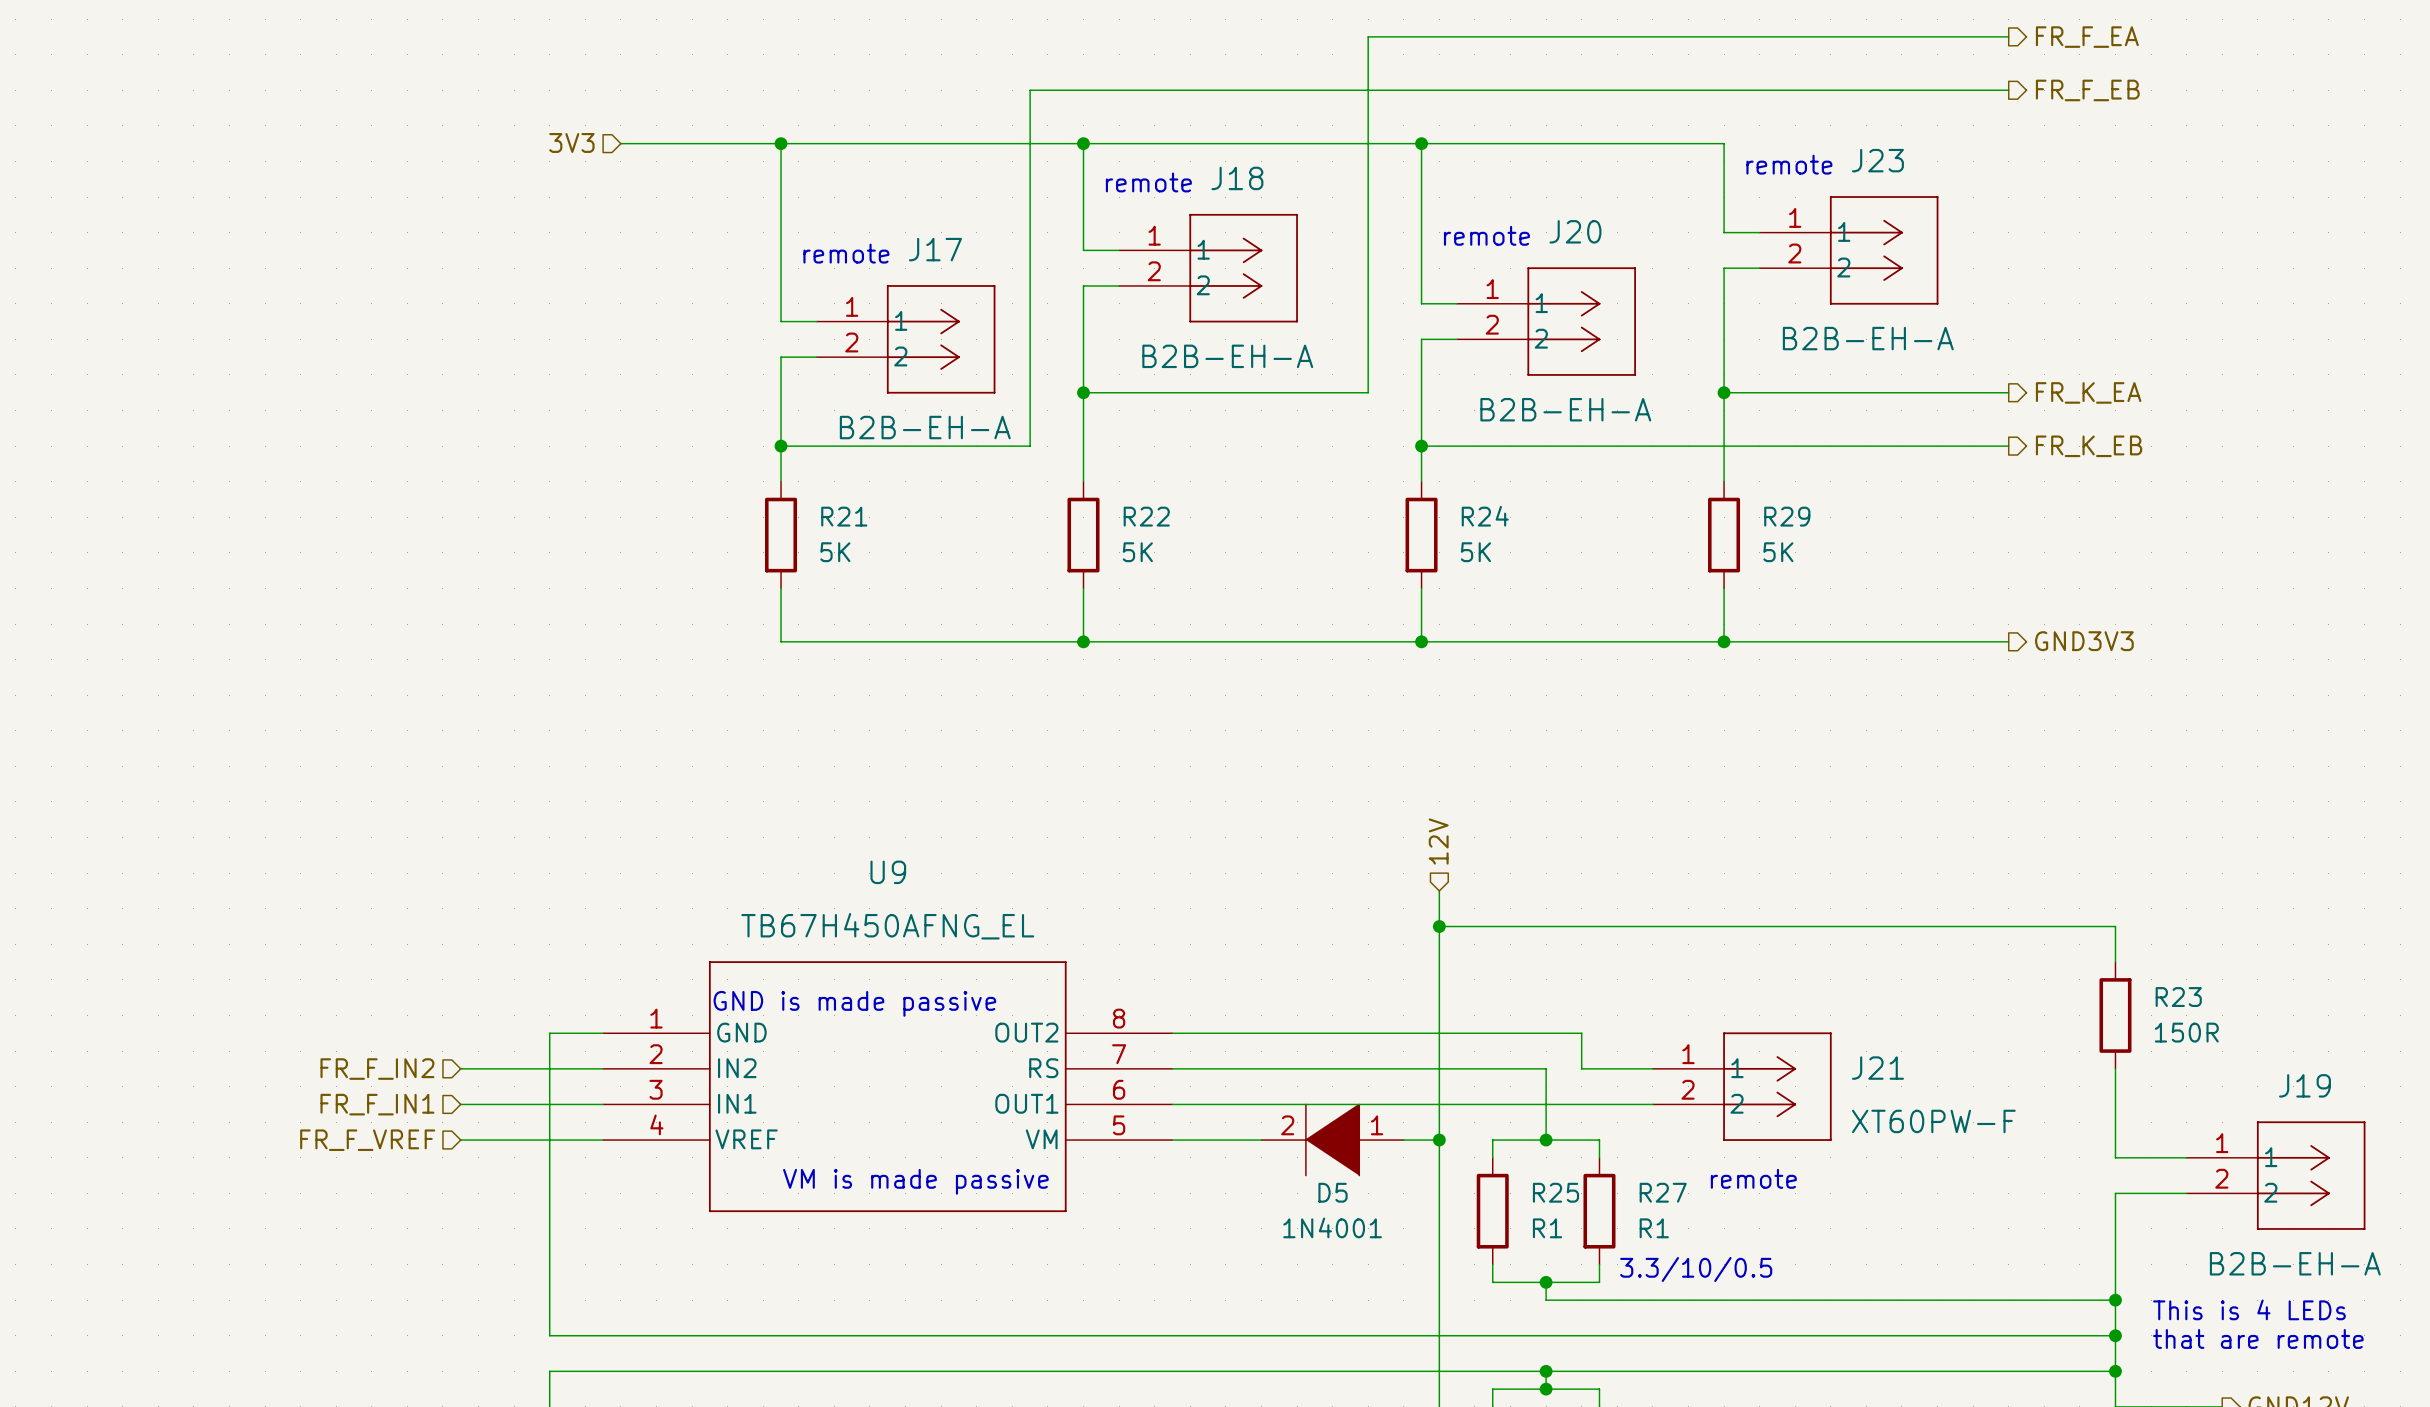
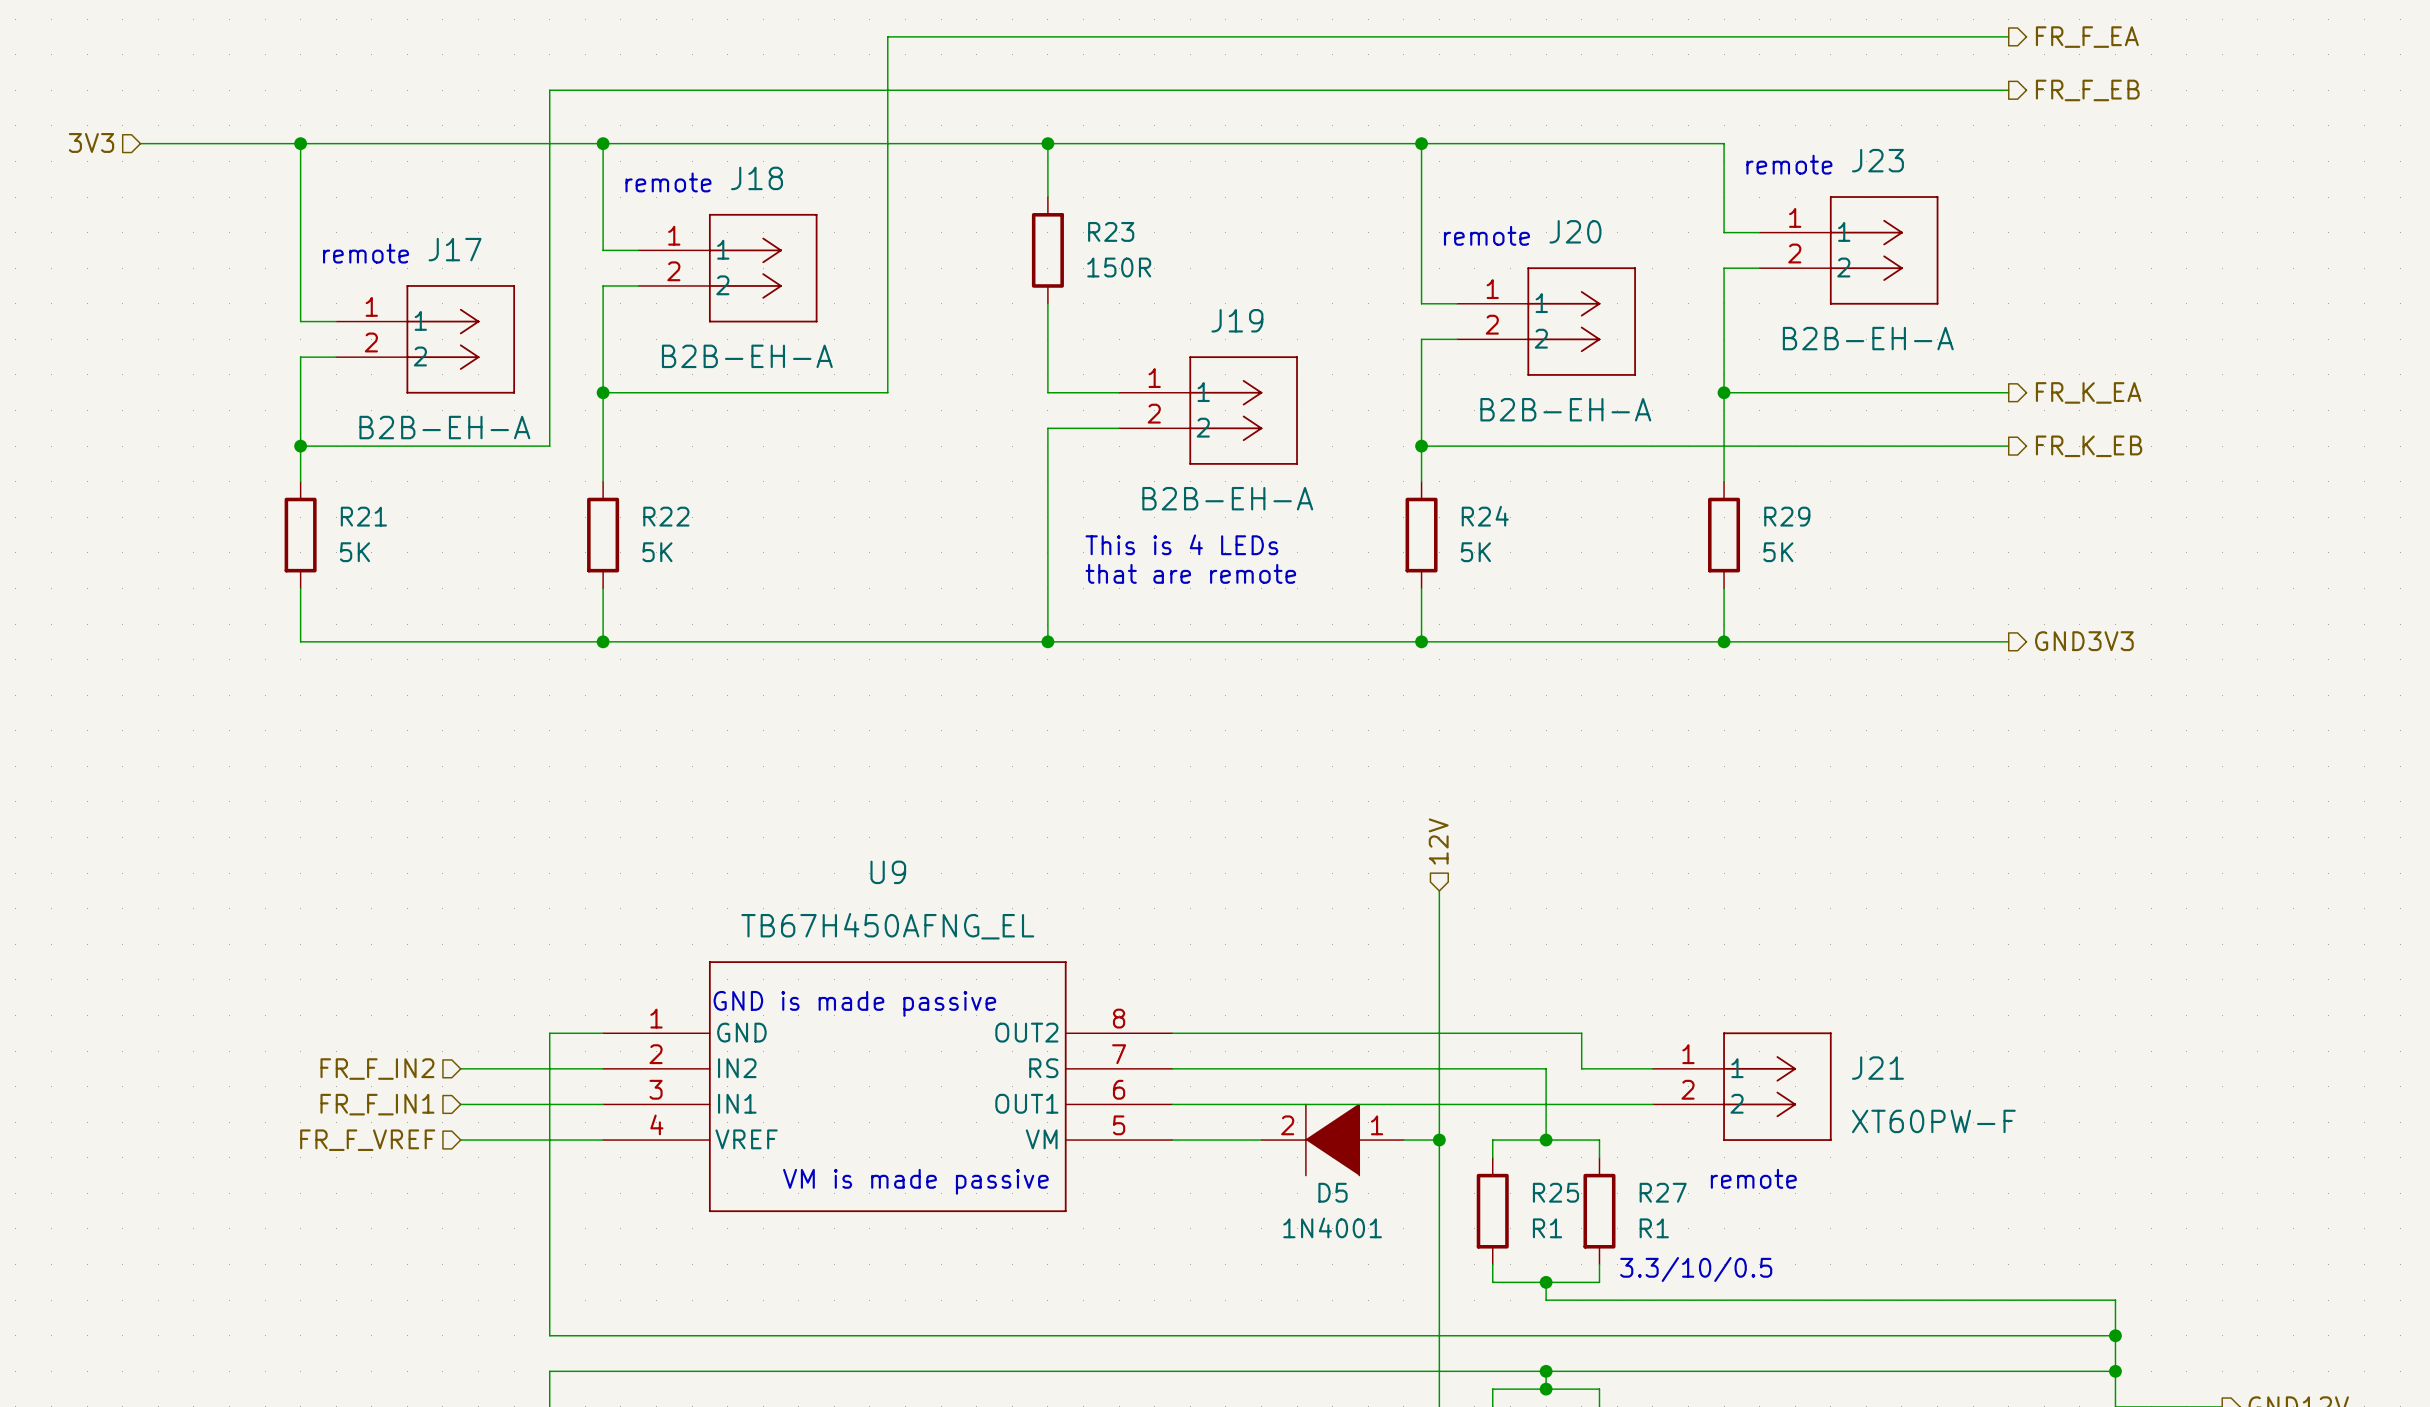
wire: (1368, 36) (1368, 392) (1119, 392) -> (1368, 36) (887, 36) (887, 392) (603, 392)
wire: (1030, 90) (1030, 446) (781, 446) -> (1030, 90) (549, 90) (549, 446) (300, 446)
hierarchical label: none -> 3V3 (91, 142)
hierarchical label: 3V3 (571, 142) -> none
wire: none -> (140, 143) (620, 143)
wire: none -> (300, 143) (300, 321) (336, 321)
junction: none -> (300, 143)
wire: none -> (603, 143) (603, 250) (638, 250)
junction: none -> (603, 143)
wire: (781, 143) (781, 321) (816, 321) -> none
junction: (781, 143) -> none
wire: none -> (1047, 143) (1047, 197)
wire: (1083, 143) (1083, 250) (1119, 250) -> none
junction position: (1083, 143) -> (1047, 143)
text: remote (1148, 182) -> none
text: none -> remote (365, 253)
text position: remote (846, 253) -> remote (668, 182)
J18 position: (1208, 268) -> (728, 268)
wire: none -> (638, 285) (603, 285) (603, 481)
wire: (1119, 285) (1083, 285) (1083, 481) -> none
wire: none -> (1047, 303) (1047, 392) (1083, 392)
J17 position: (906, 339) -> (425, 339)
wire: none -> (336, 357) (300, 357) (300, 481)
wire: (816, 357) (781, 357) (781, 481) -> none
junction: none -> (603, 392)
junction: (1083, 392) -> none
wire: none -> (1119, 428) (1047, 428) (1047, 641)
junction: none -> (300, 446)
junction: (781, 446) -> none
R21 position: (781, 535) -> (300, 535)
R22 position: (1083, 535) -> (603, 535)
text: none -> This is 4 LEDs (1181, 544)
text: none -> that are remote (1190, 573)
wire: none -> (603, 588) (603, 641)
wire: (781, 588) (781, 641) -> (300, 588) (300, 641) (781, 641)
wire: (1083, 588) (1083, 641) -> none
junction: none -> (603, 641)
junction position: (1083, 641) -> (1047, 641)
wire: (1439, 926) (2115, 926) (2115, 962) -> none
junction: (1439, 926) -> none
R23 position: (2115, 1015) -> (1047, 250)
wire: (2115, 1068) (2115, 1157) (2186, 1157) -> none
J19 position: (2276, 1175) -> (1208, 410)
wire: (2186, 1193) (2115, 1193) (2115, 1300) -> none
junction: (2115, 1300) -> none
text: This is 4 LEDs (2249, 1309) -> none
text: that are remote (2258, 1338) -> none

